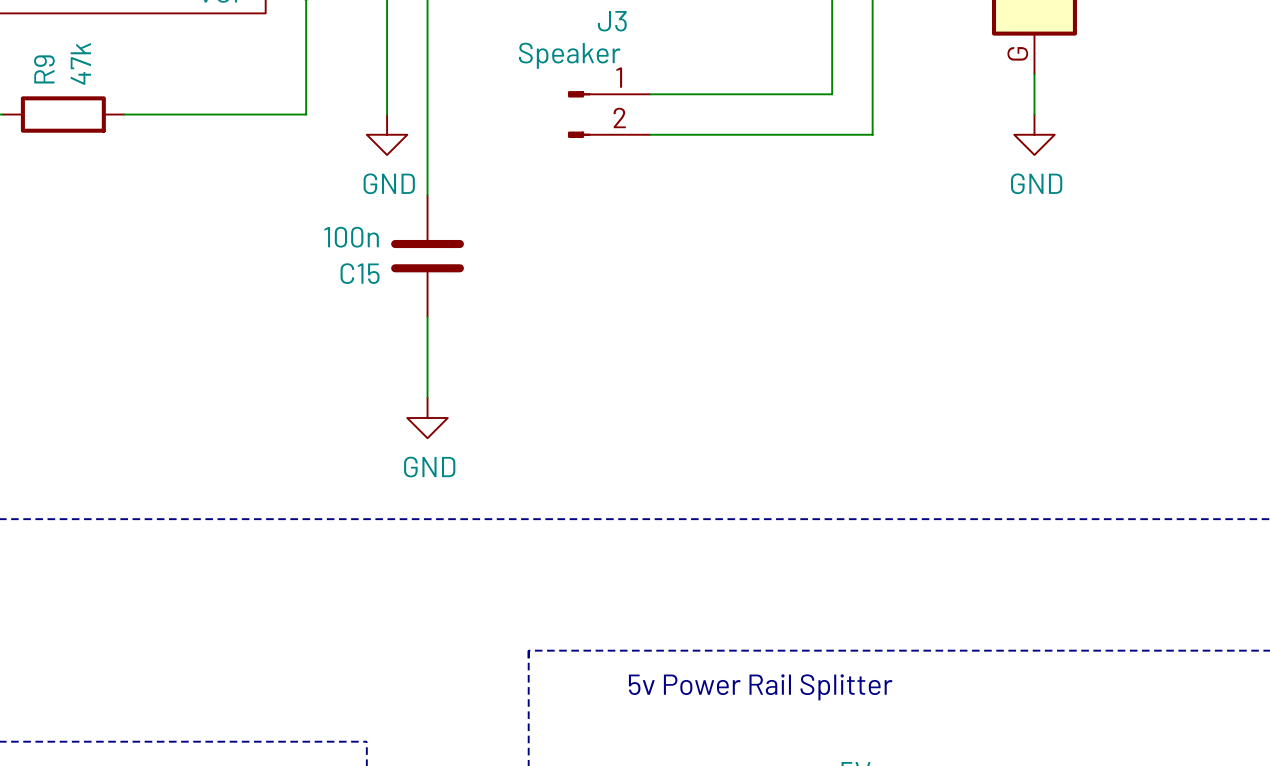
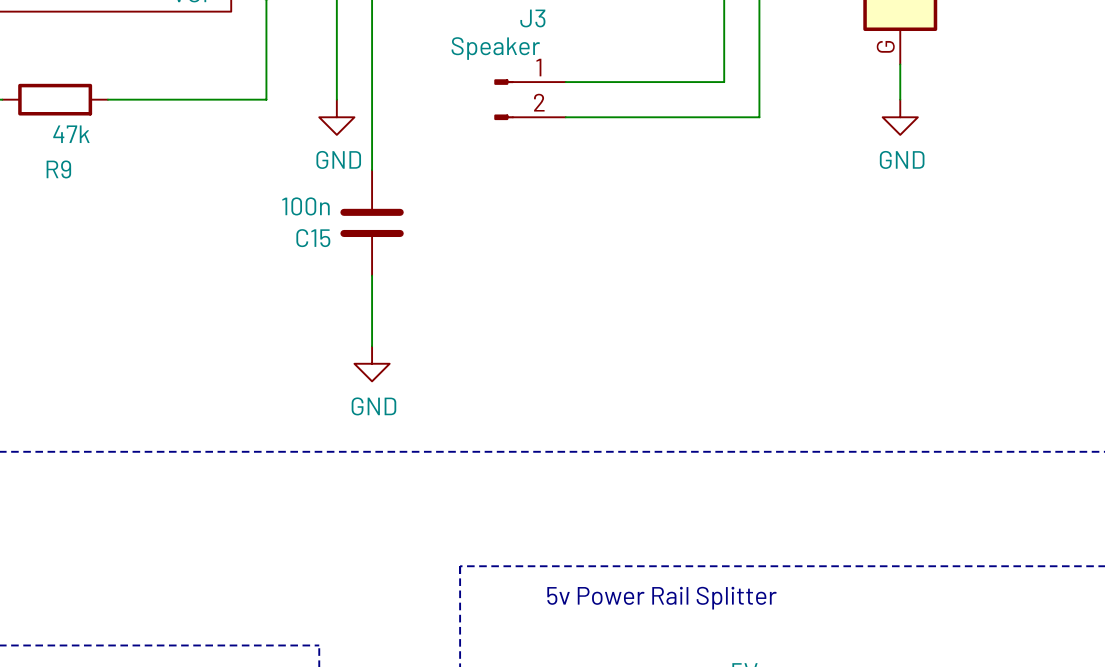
R9 value rotation: 0° (80, 63) -> 90° clockwise (71, 134)
R9 value position: 47k (80, 63) -> 47k (71, 134)
R9 name rotation: 0° (44, 69) -> 90° clockwise (58, 169)
R9 name position: R9 (44, 69) -> R9 (58, 169)

